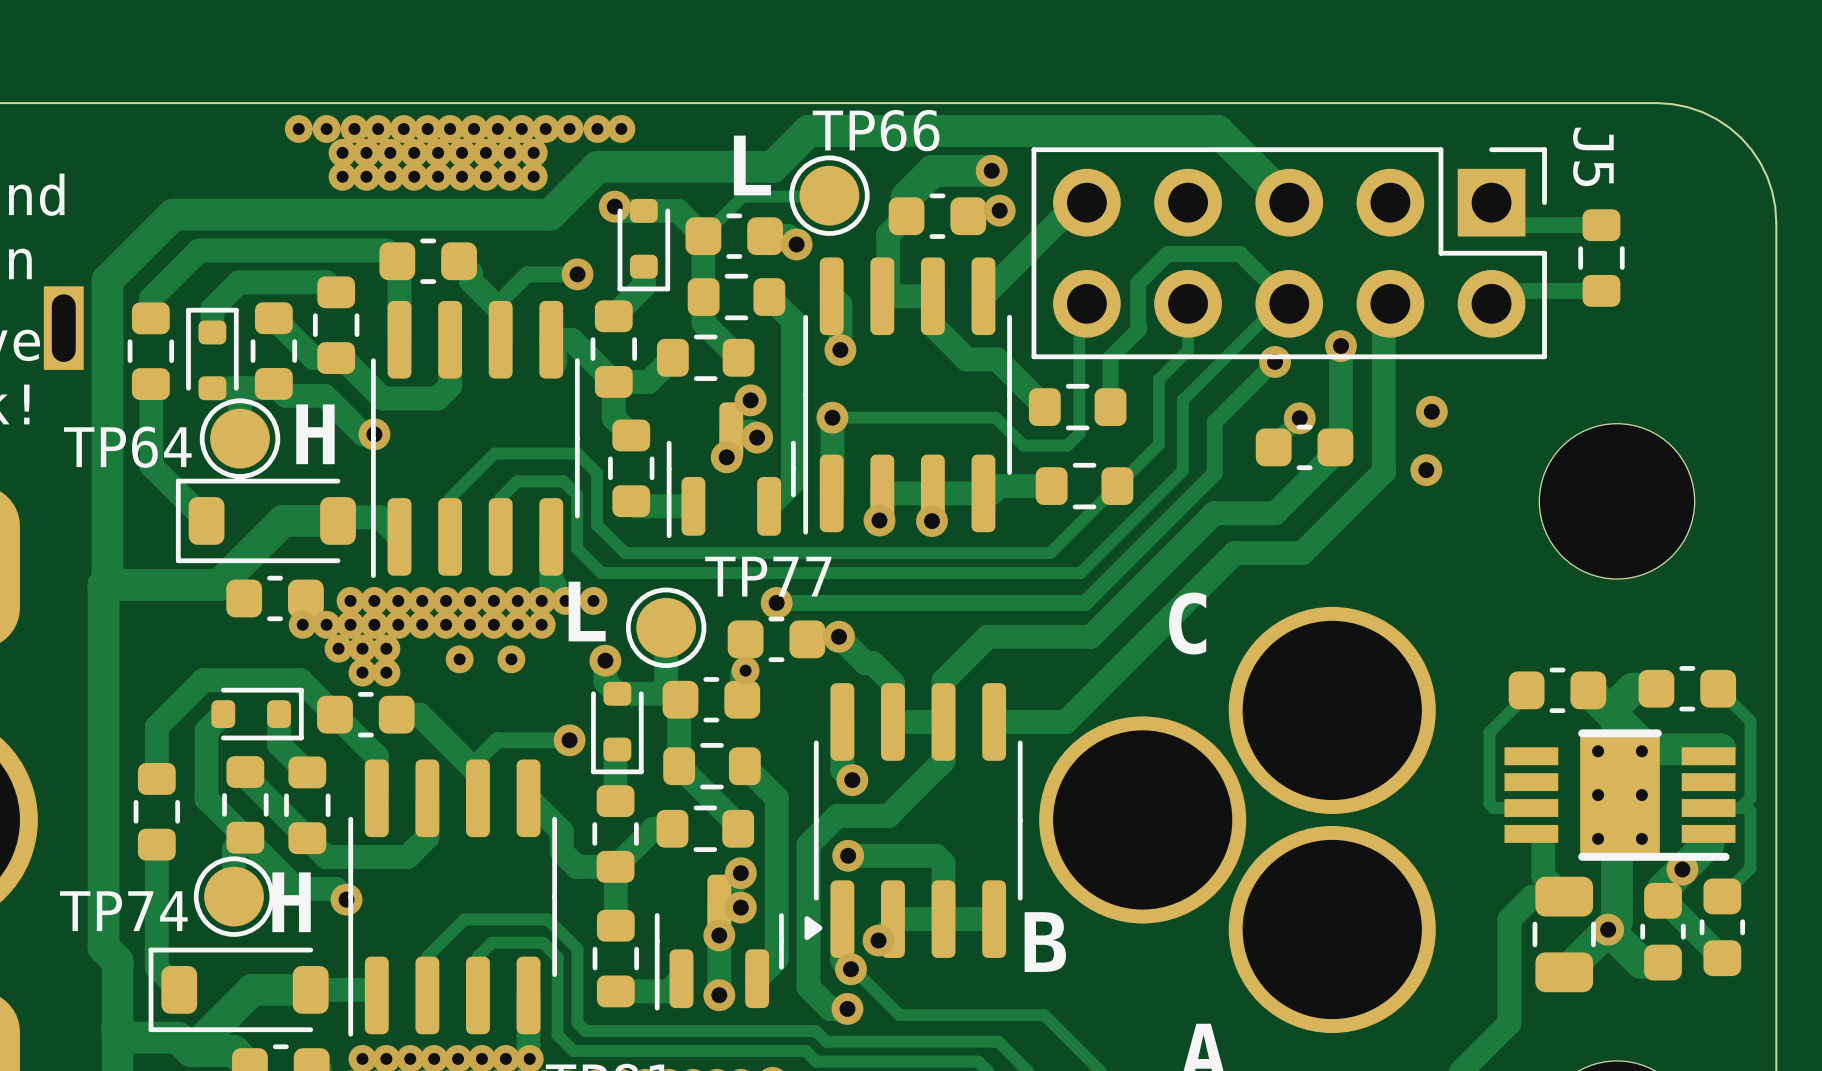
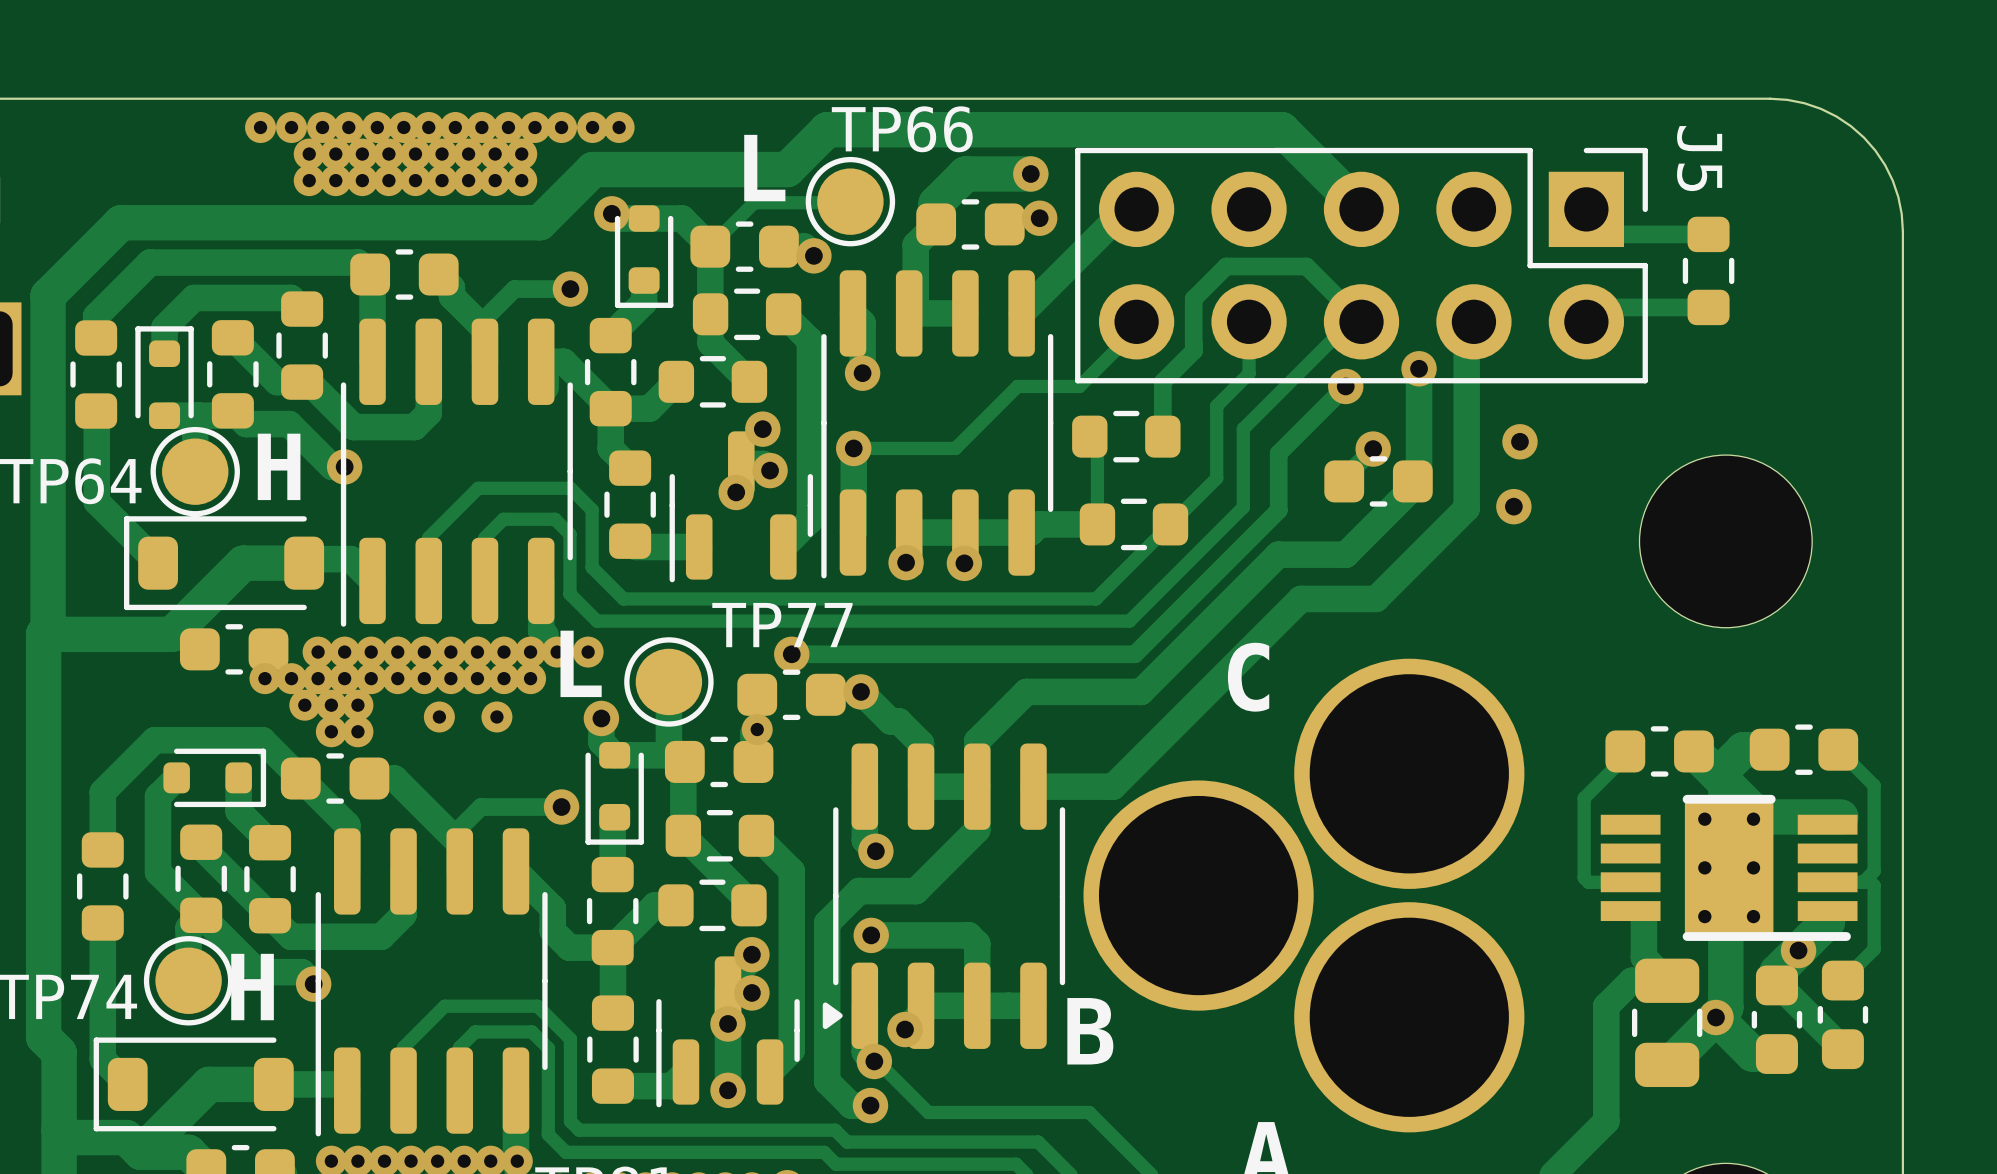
track: (932, 296) (932, 325) (966, 359) (997, 359) (1044, 407) -> (1097, 524) (1097, 444) (1089, 436)
track: (1077, 313) (1079, 315) (1079, 433) (1067, 445) (1023, 445) (995, 417) (924, 417) -> (1126, 332) (1126, 339) (1079, 386) (1017, 386) (955, 448)

